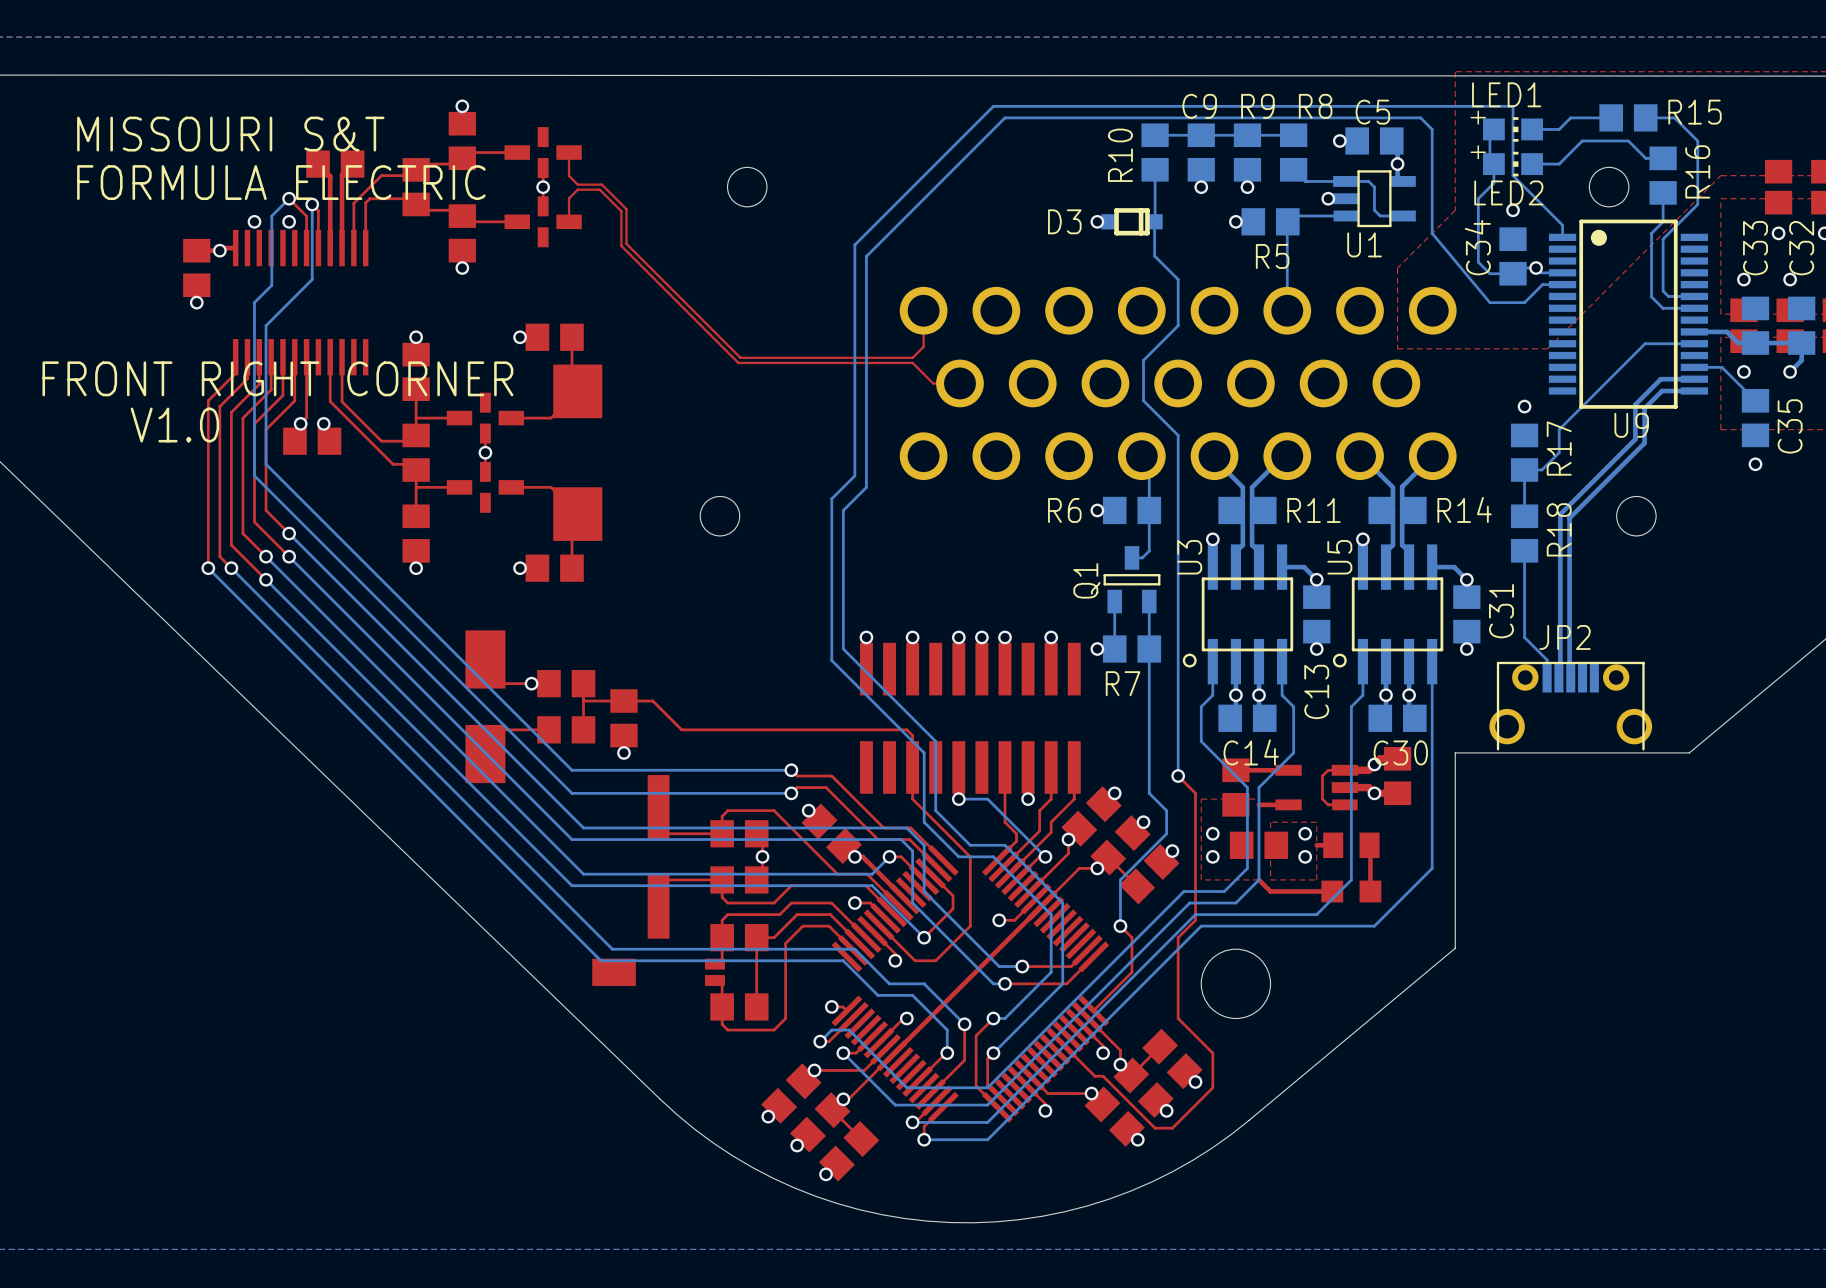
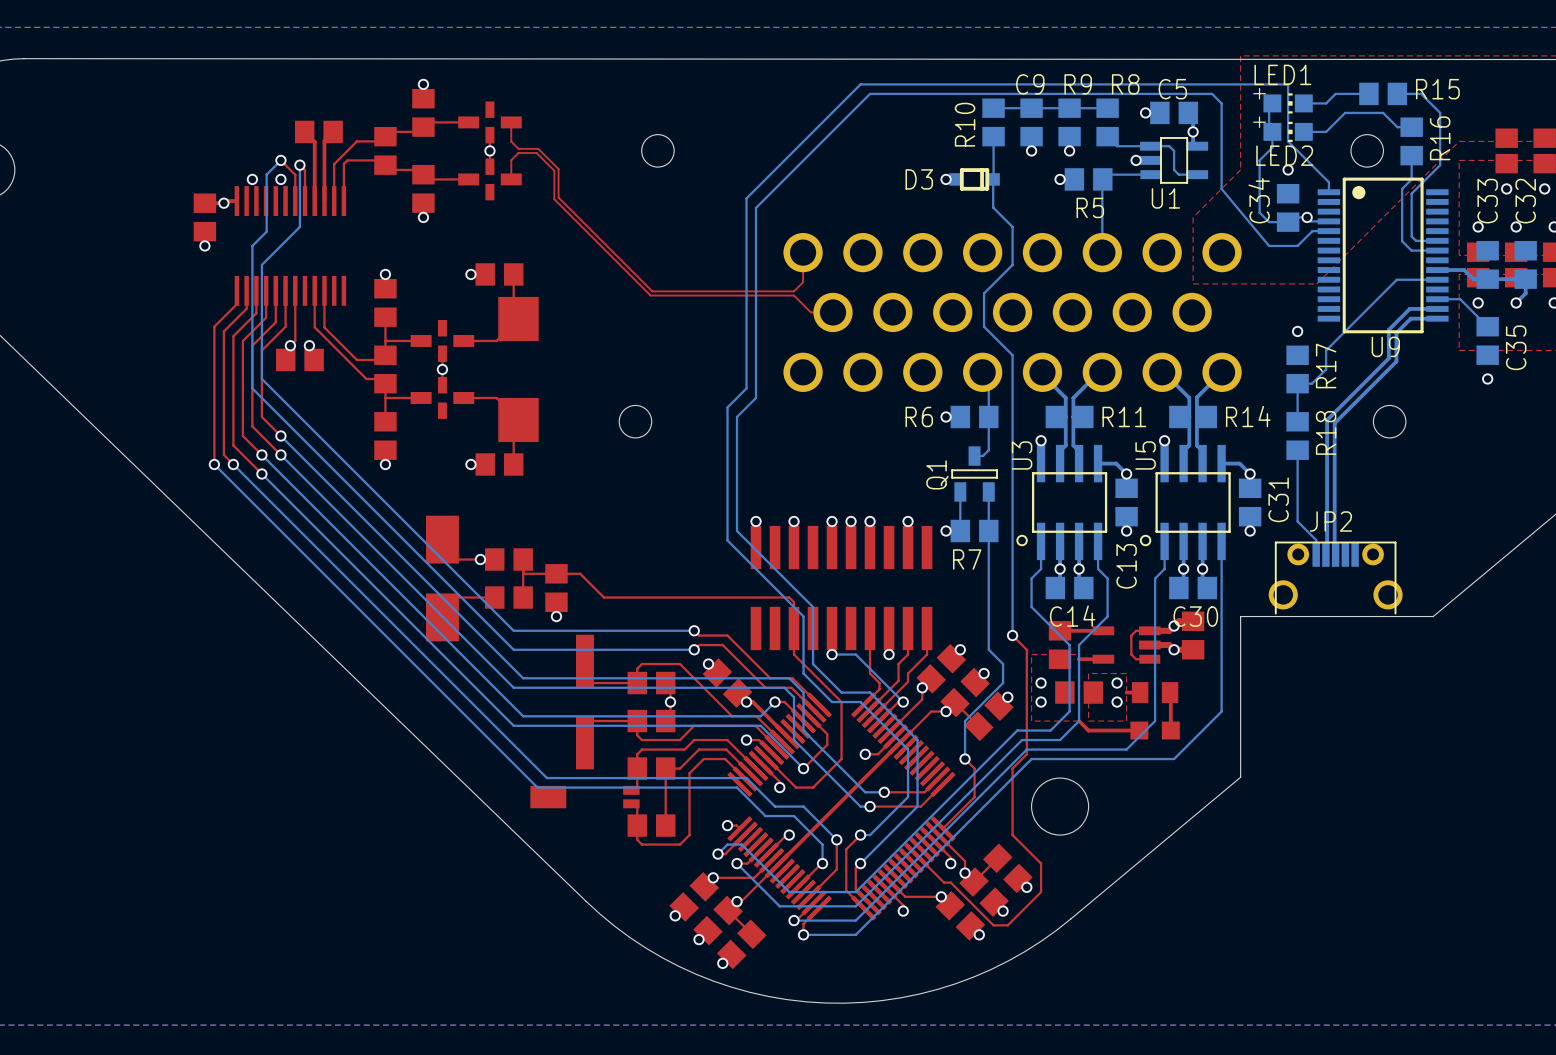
text: MISSOURI S&T (230, 134) -> none
text: FORMULA ELECTRIC (281, 182) -> none
text: FRONT RIGHT CORNER (277, 378) -> none
text: V1.0 (174, 425) -> none

